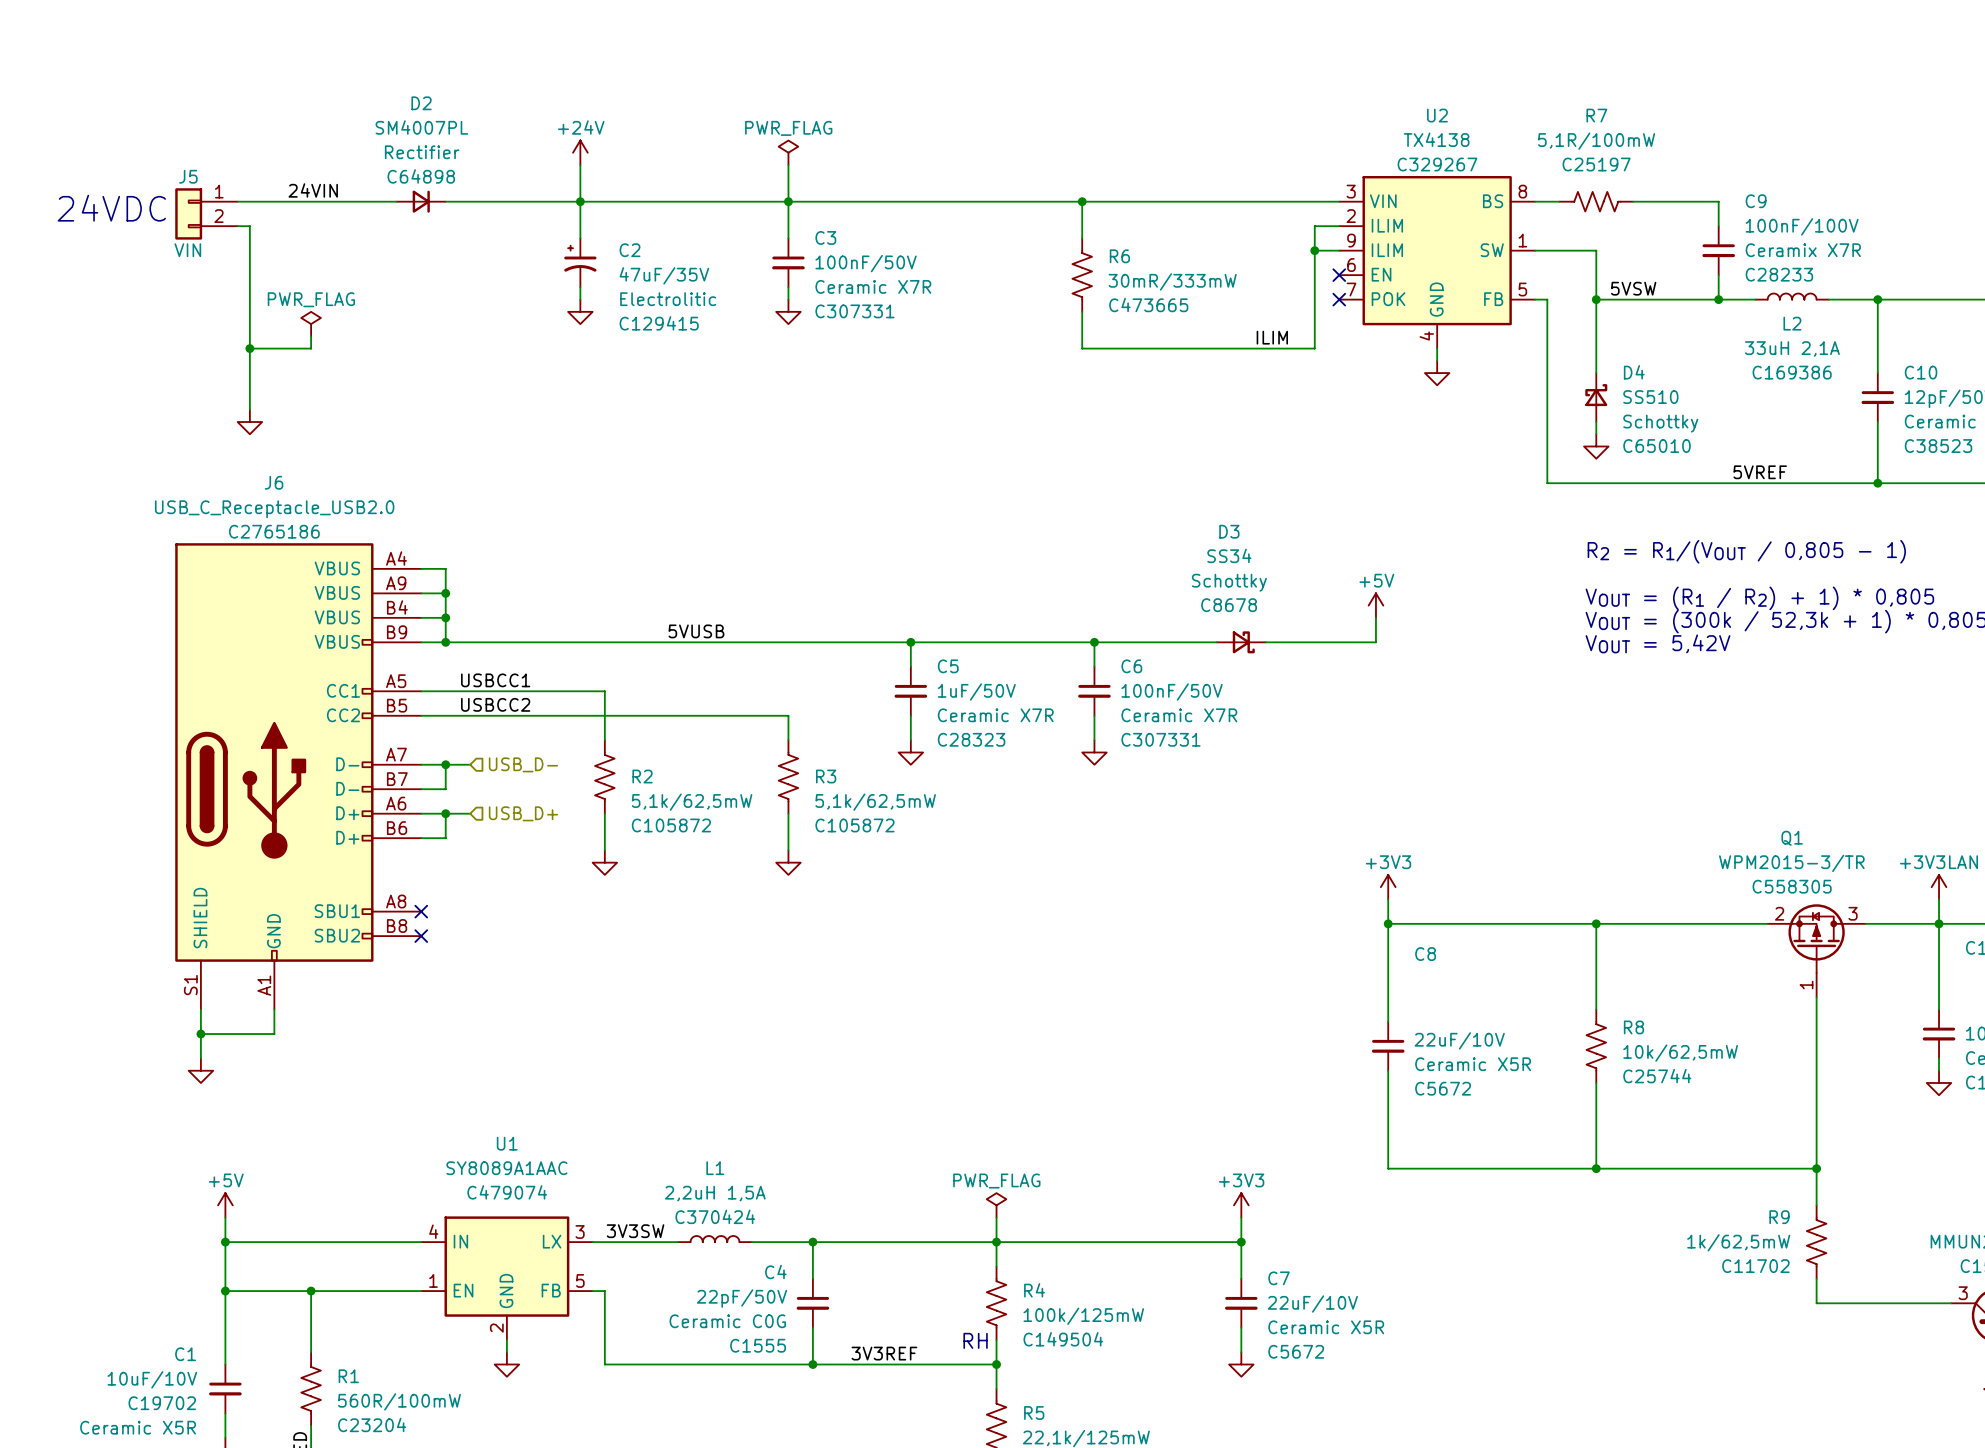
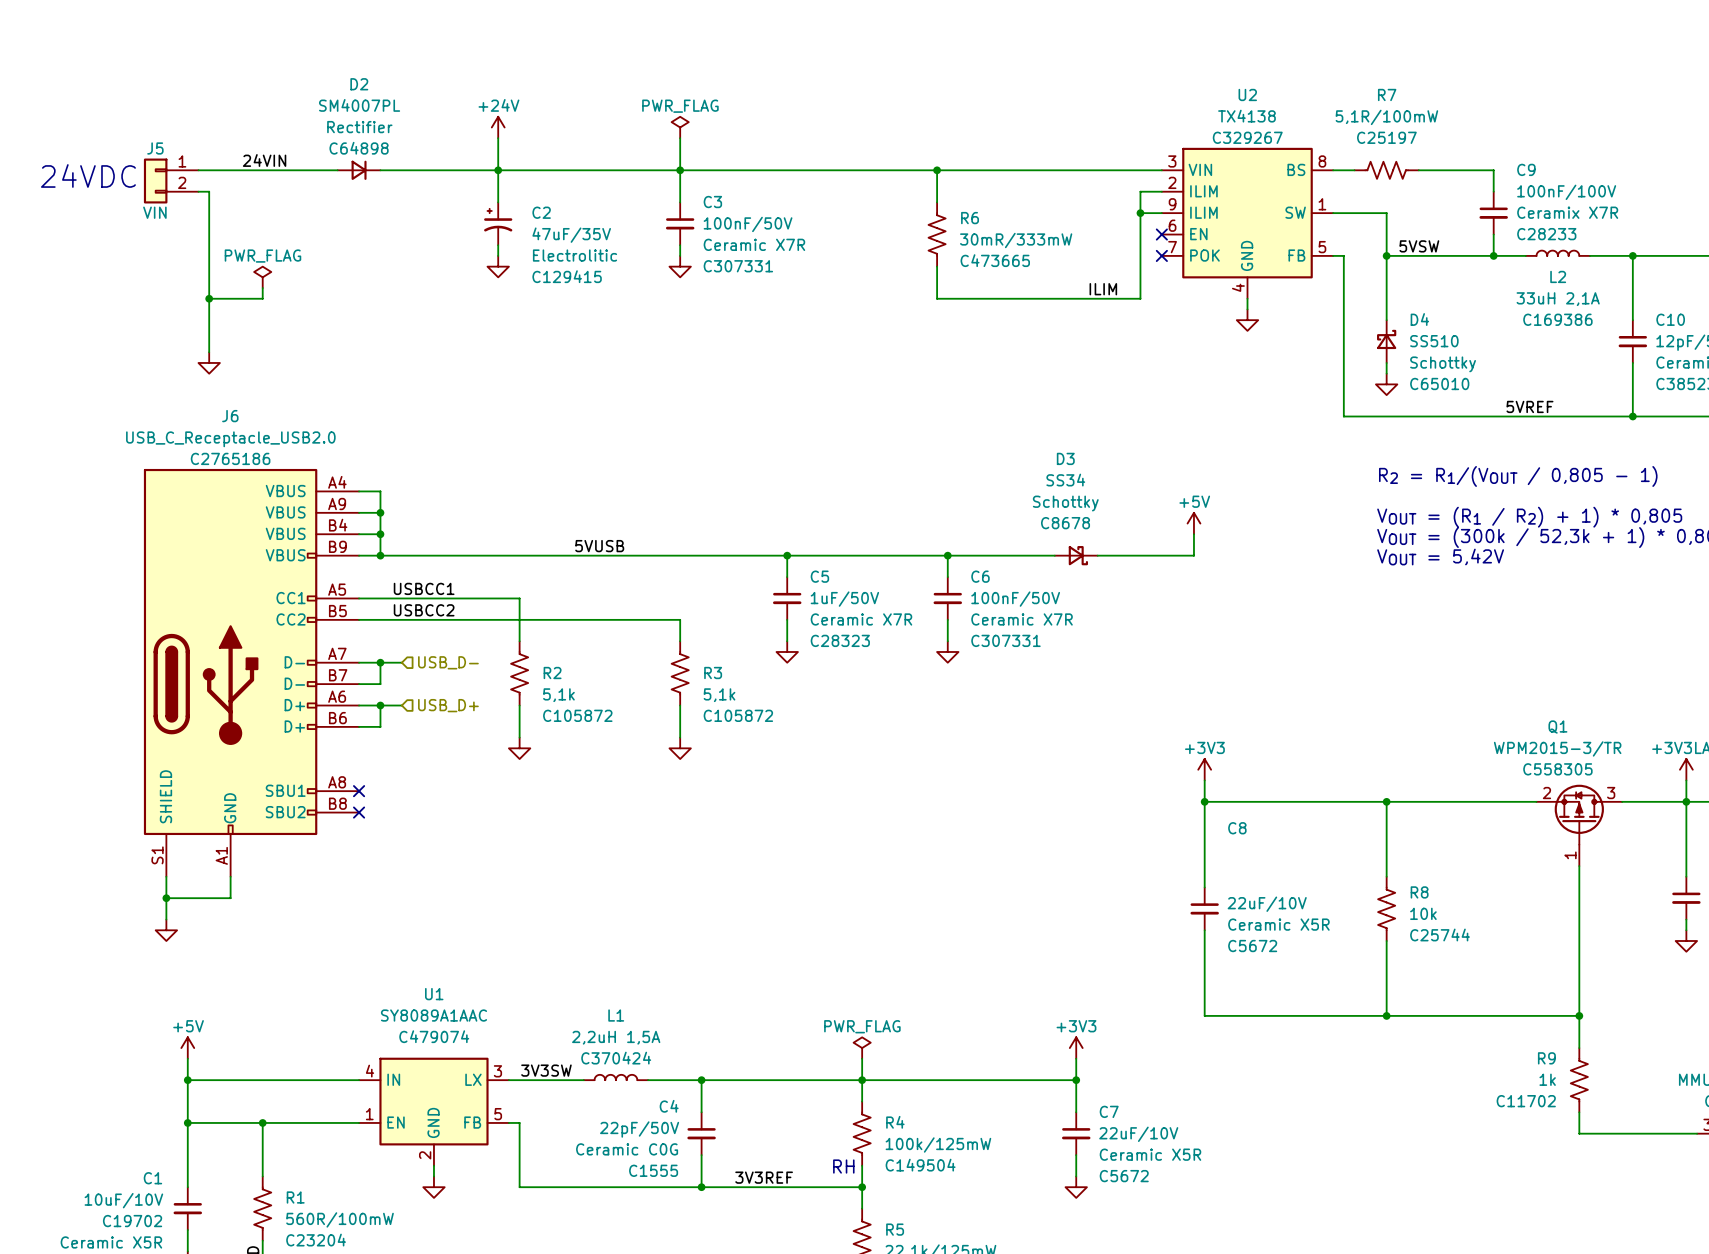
R2 value: 5,1k/62,5mW (692, 802) -> 5,1k (558, 695)
R3 value: 5,1k/62,5mW (875, 802) -> 5,1k (719, 695)
R8 value: 10k/62,5mW (1680, 1053) -> 10k (1423, 913)
R9 value: 1k/62,5mW (1738, 1242) -> 1k (1547, 1079)

